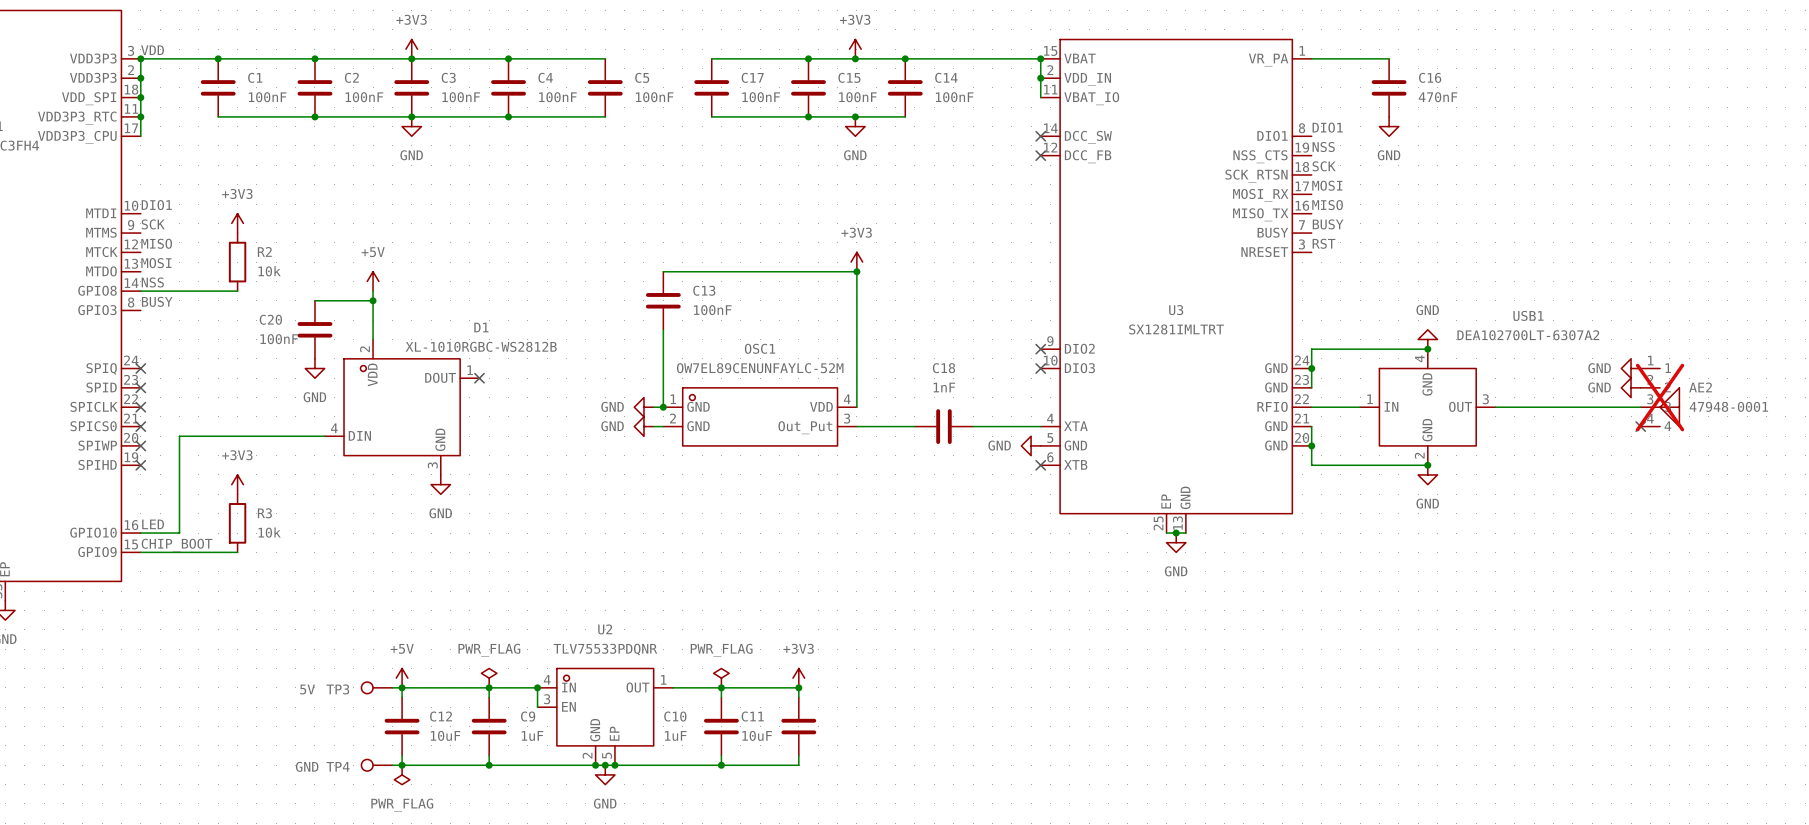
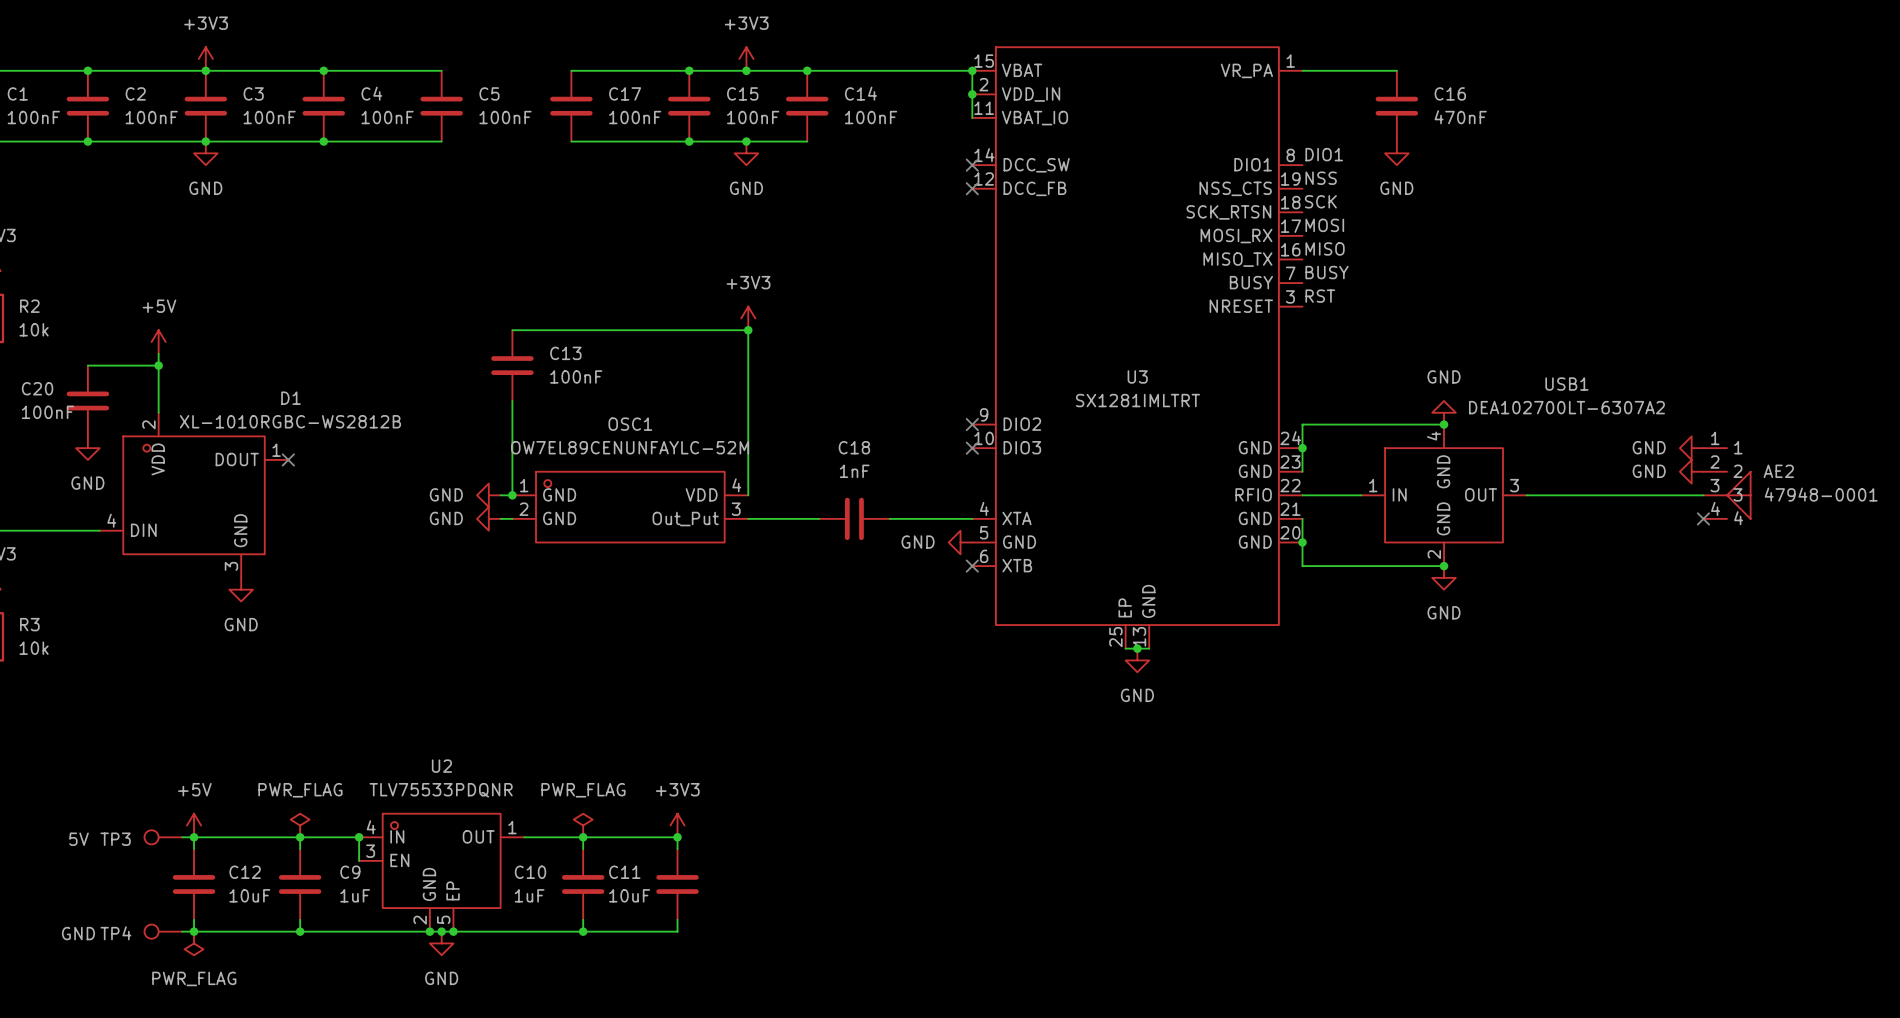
AE2 do-not-place cross: (1660, 397) -> none

